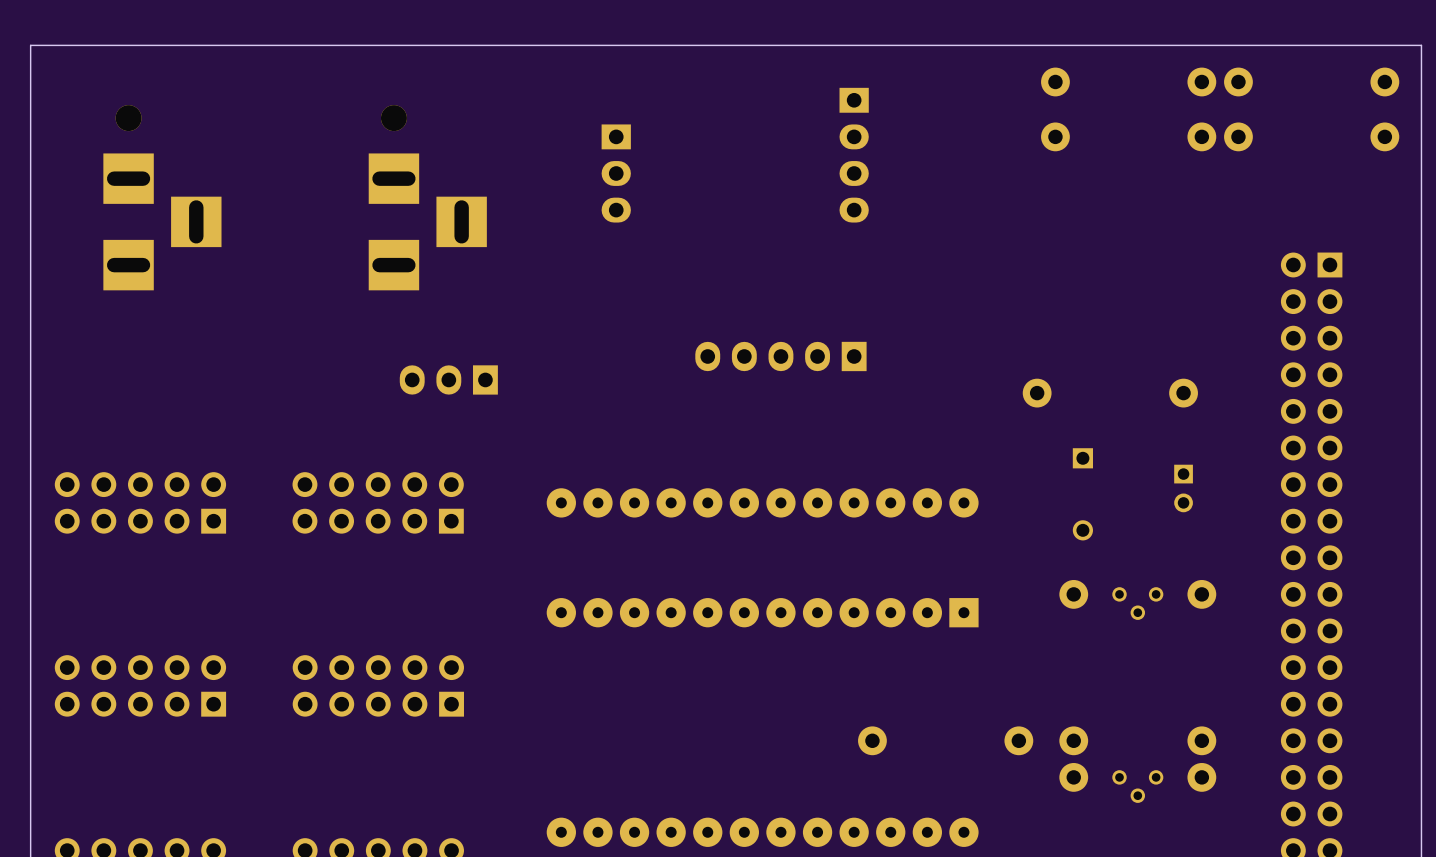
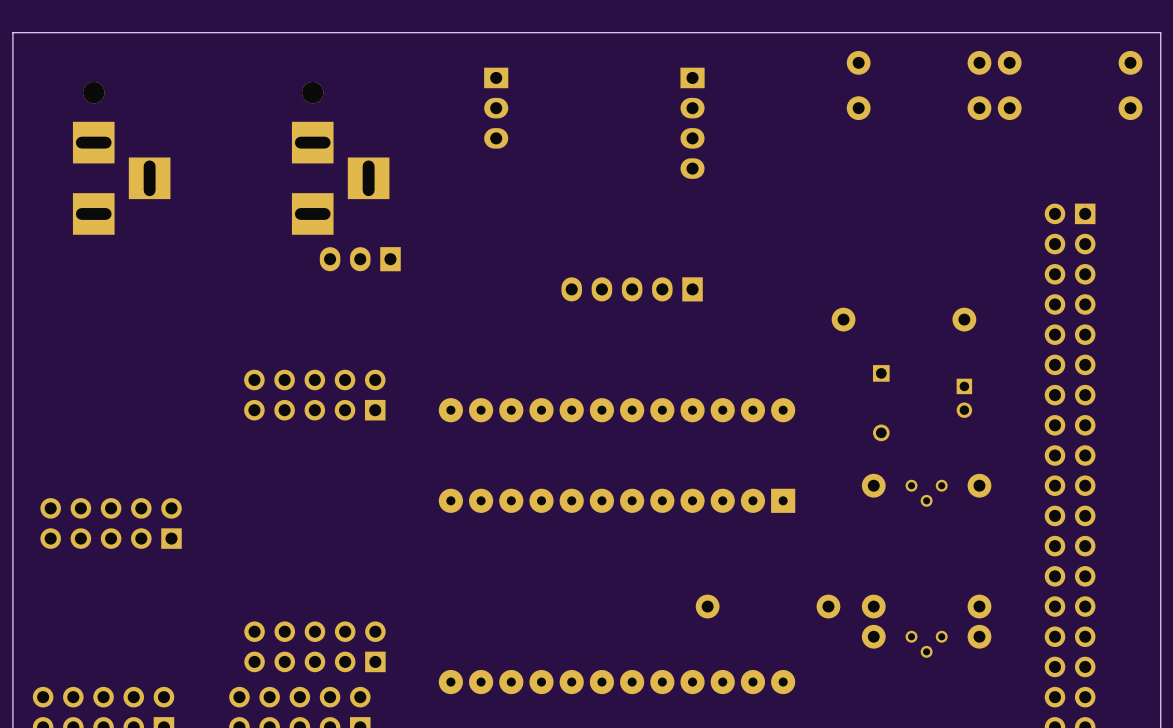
part position: (616, 173) -> (496, 108)
part position: (448, 379) -> (360, 259)
part: (140, 502) -> none
part position: (378, 502) -> (314, 395)
part position: (140, 685) -> (111, 523)
part: (378, 685) -> none
part: none -> (314, 646)

